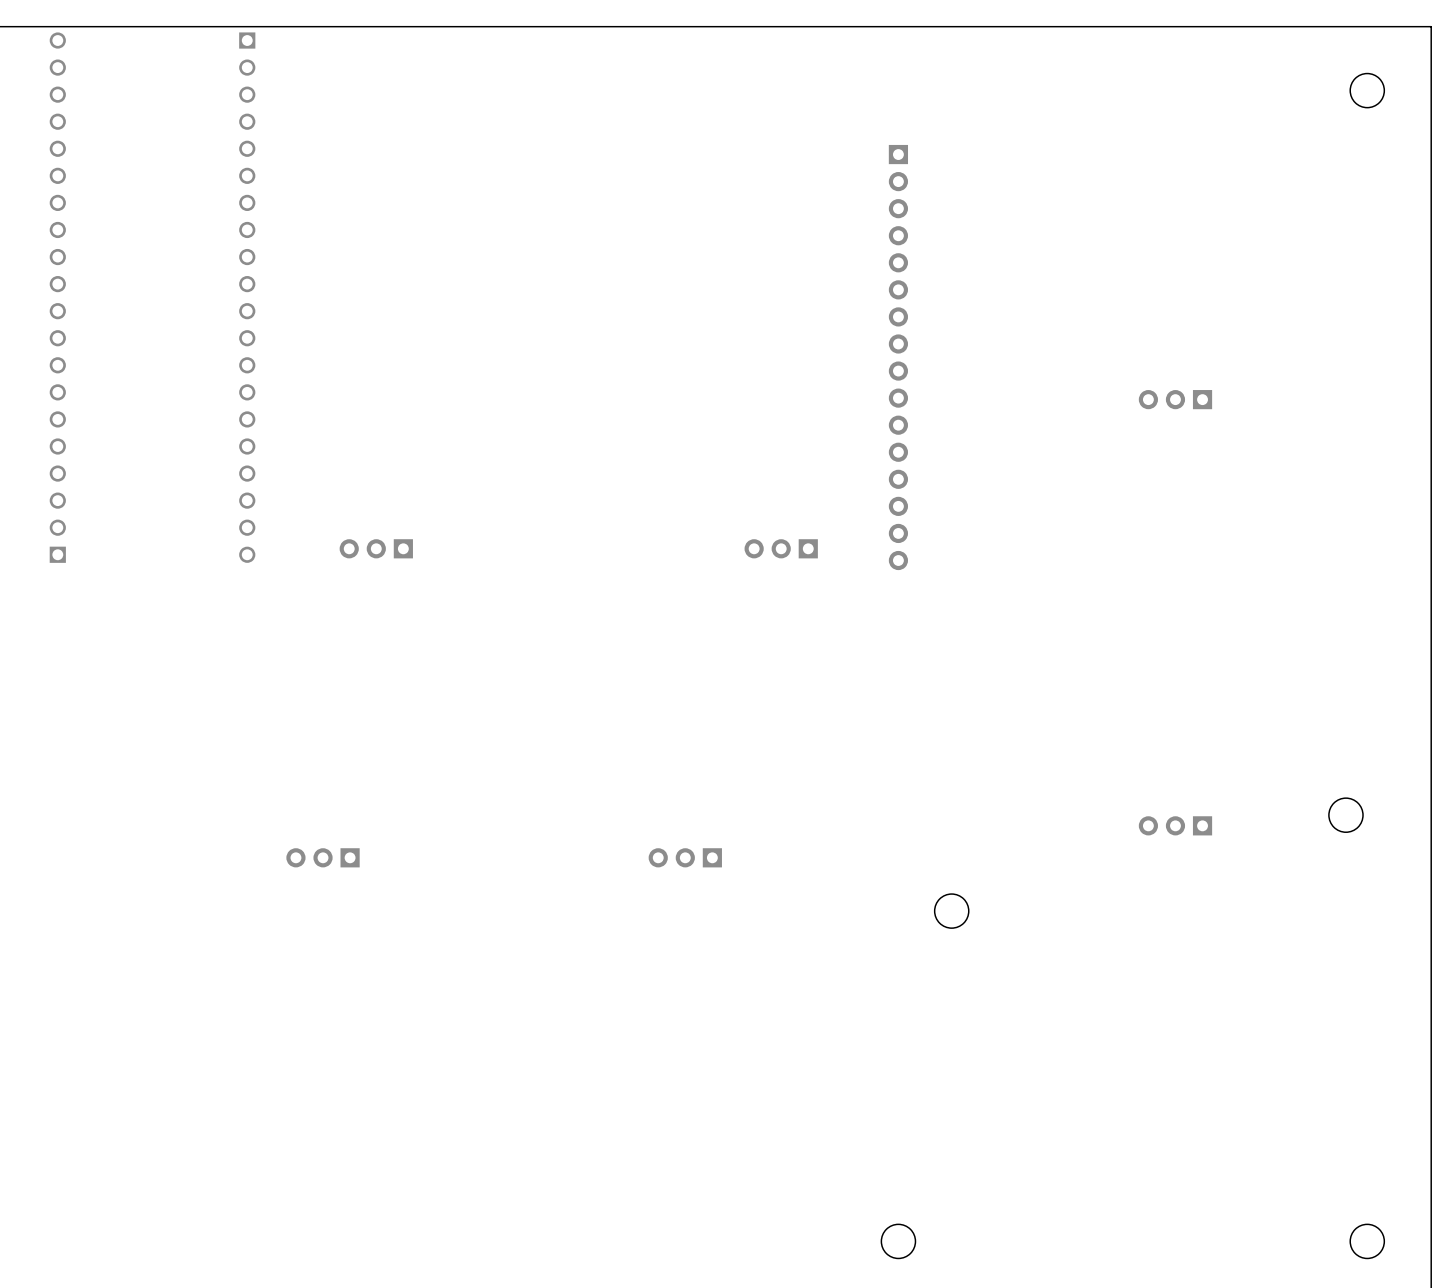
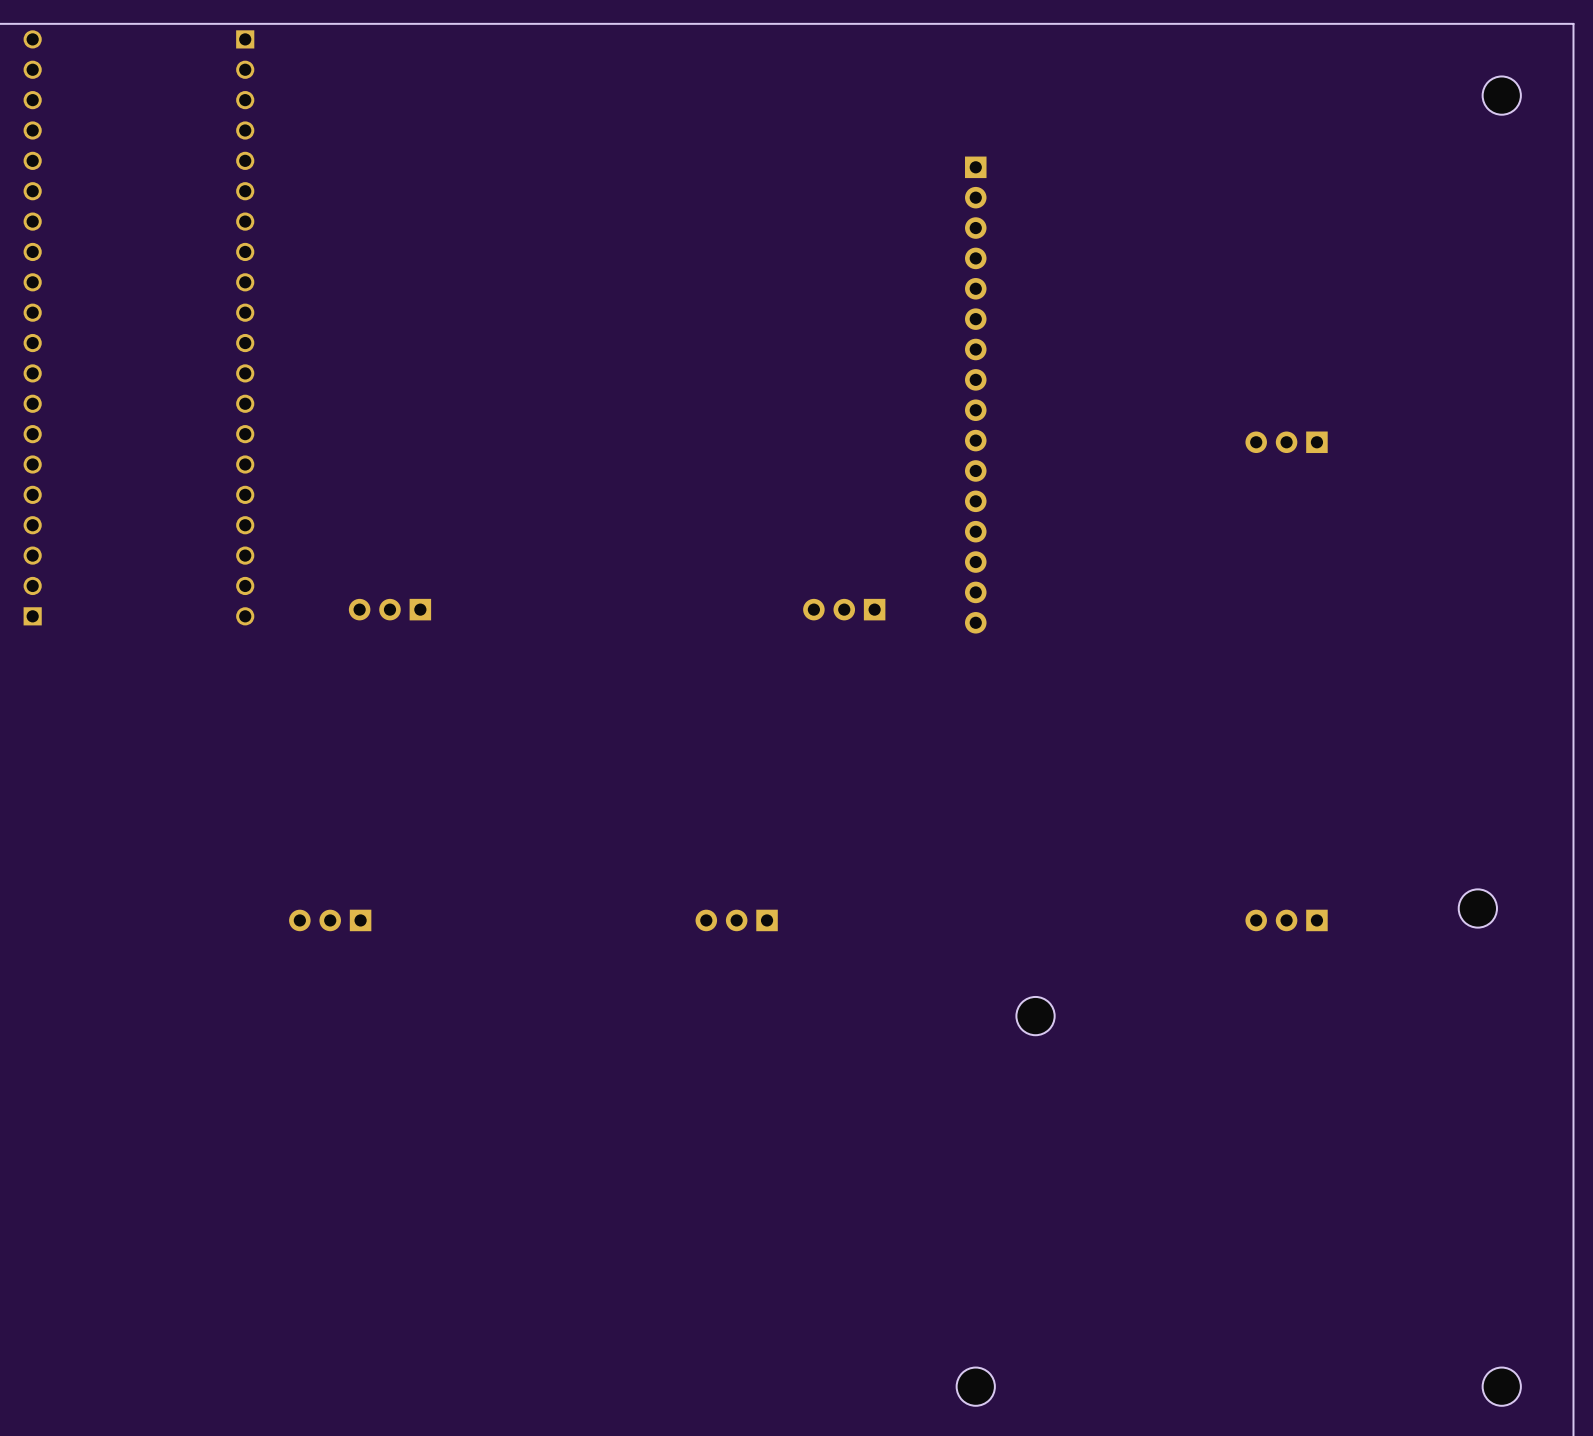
part position: (323, 857) -> (330, 920)
part position: (685, 857) -> (736, 920)

